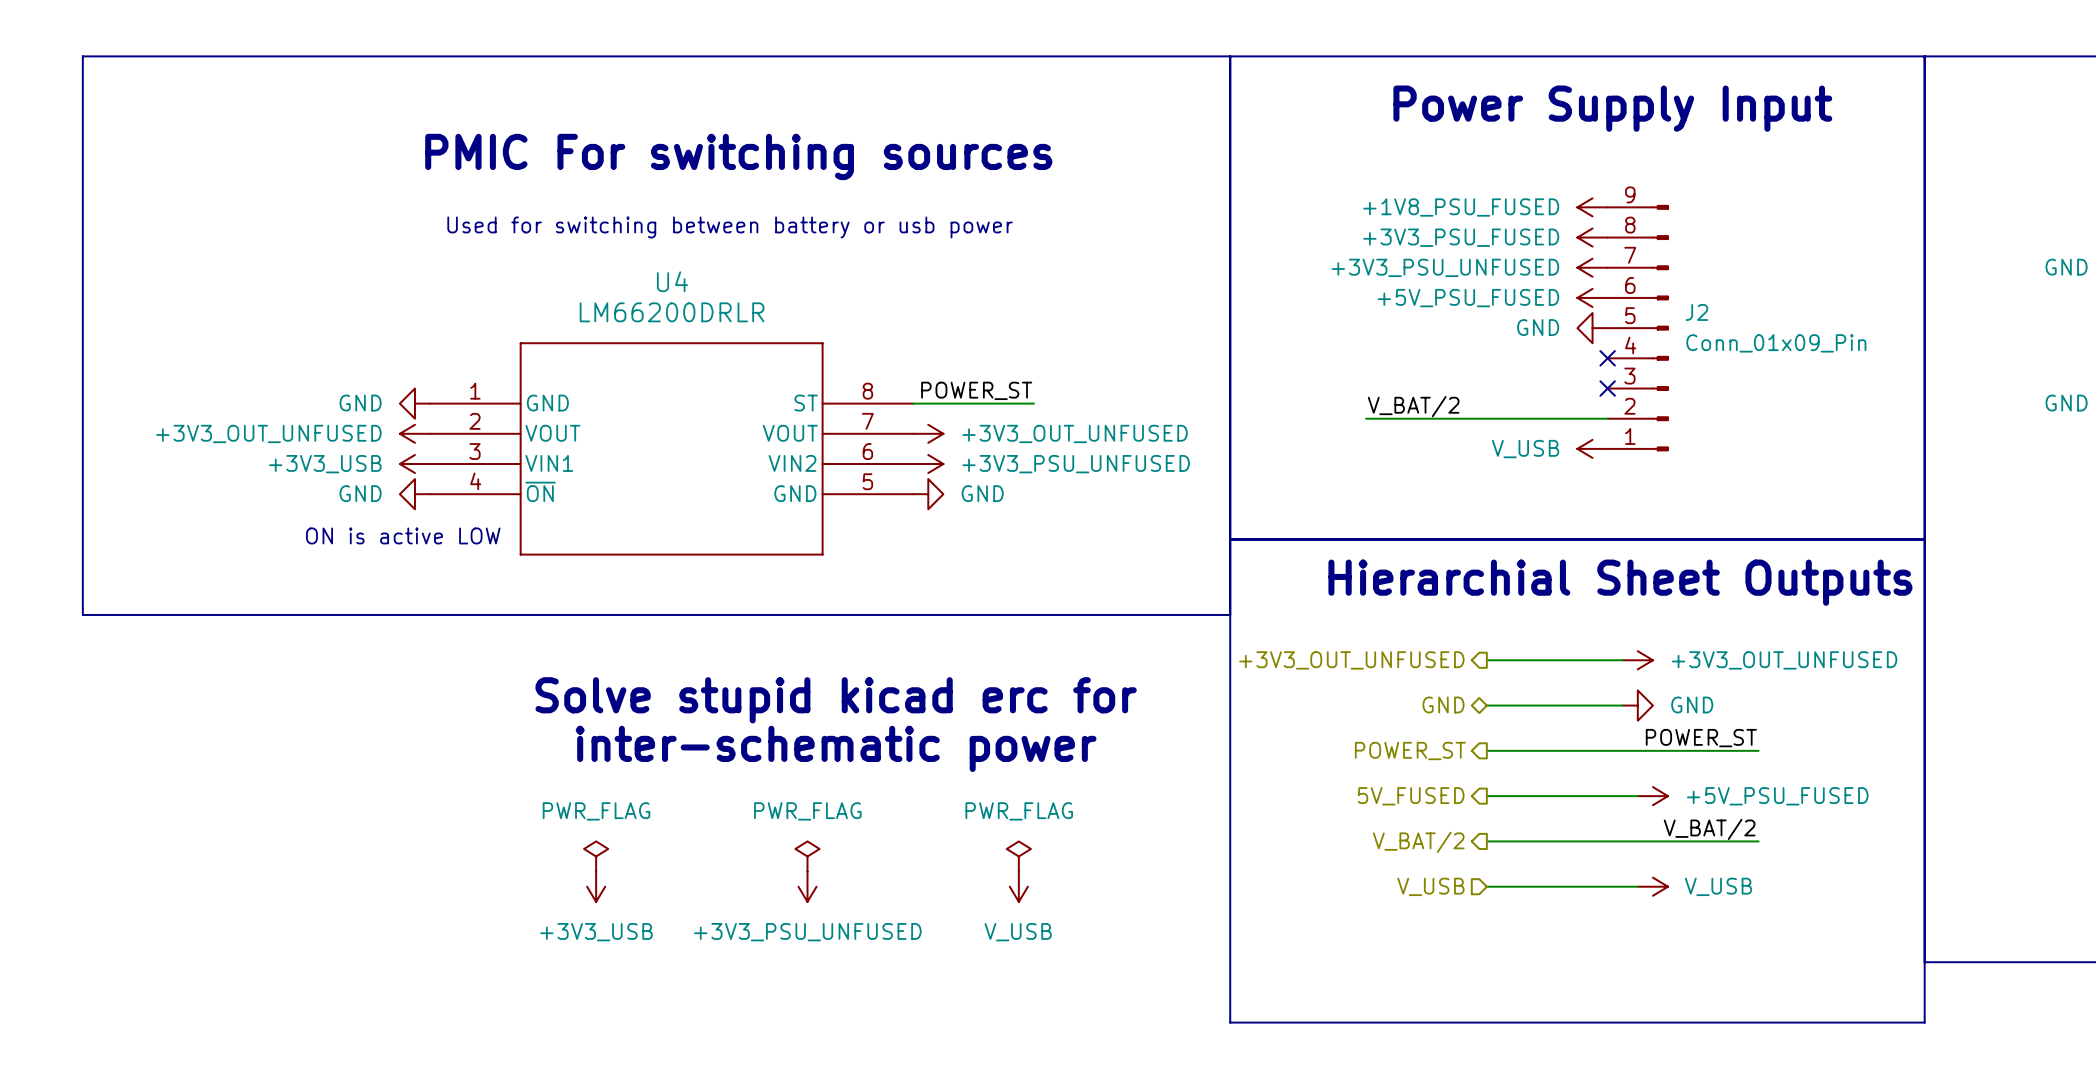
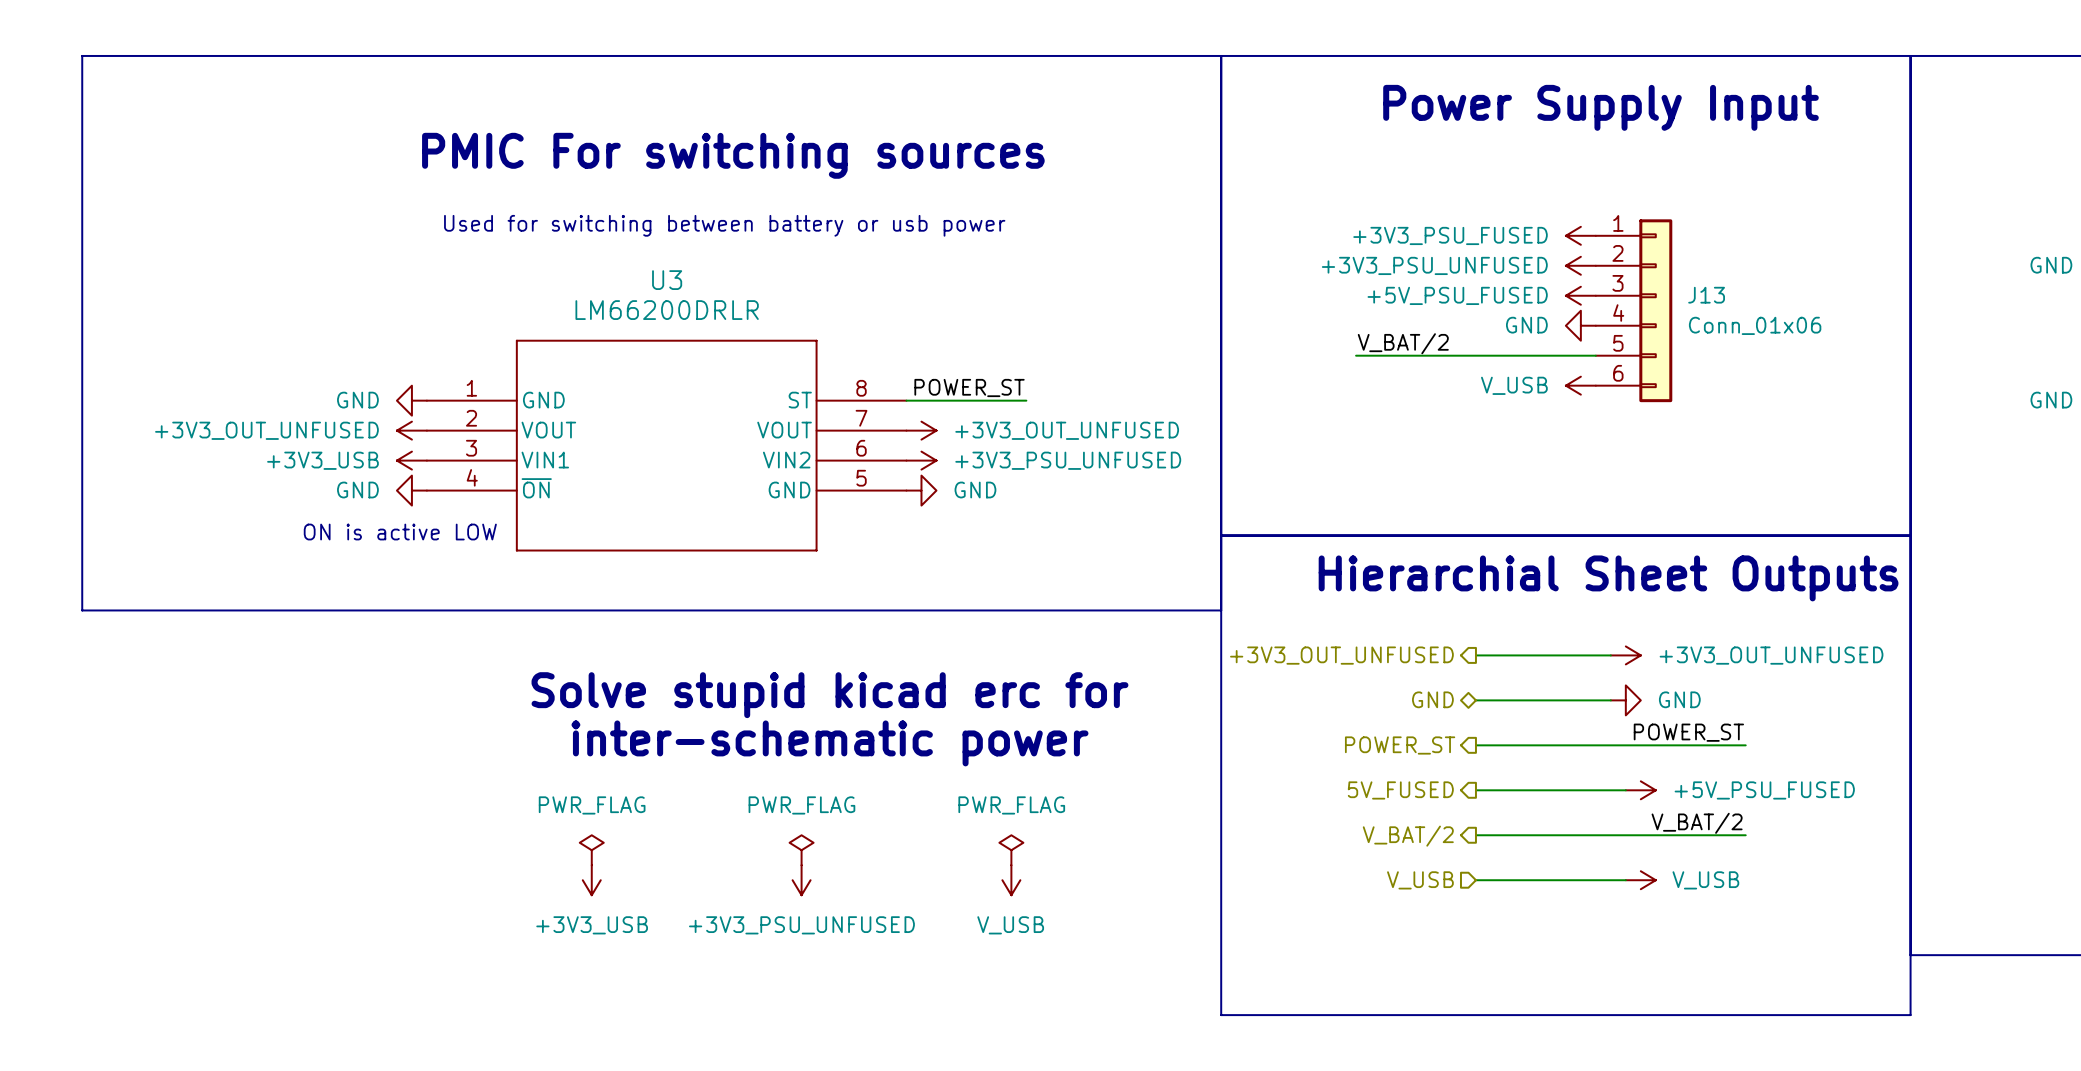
power symbol: +1V8_PSU_FUSED (1592, 207) -> none
U4 name: U4 (672, 281) -> U3 (667, 280)
J13: none -> Conn_01x06 (1634, 310)
J2: Conn_01x09_Pin (1638, 328) -> none
no-connect mark: (1607, 358) -> none
no-connect mark: (1607, 388) -> none
label position: V_BAT/2 (1413, 406) -> V_BAT/2 (1403, 343)
wire: (1366, 418) (1607, 418) -> (1356, 355) (1595, 355)
power symbol position: V_USB (1592, 448) -> V_USB (1580, 385)

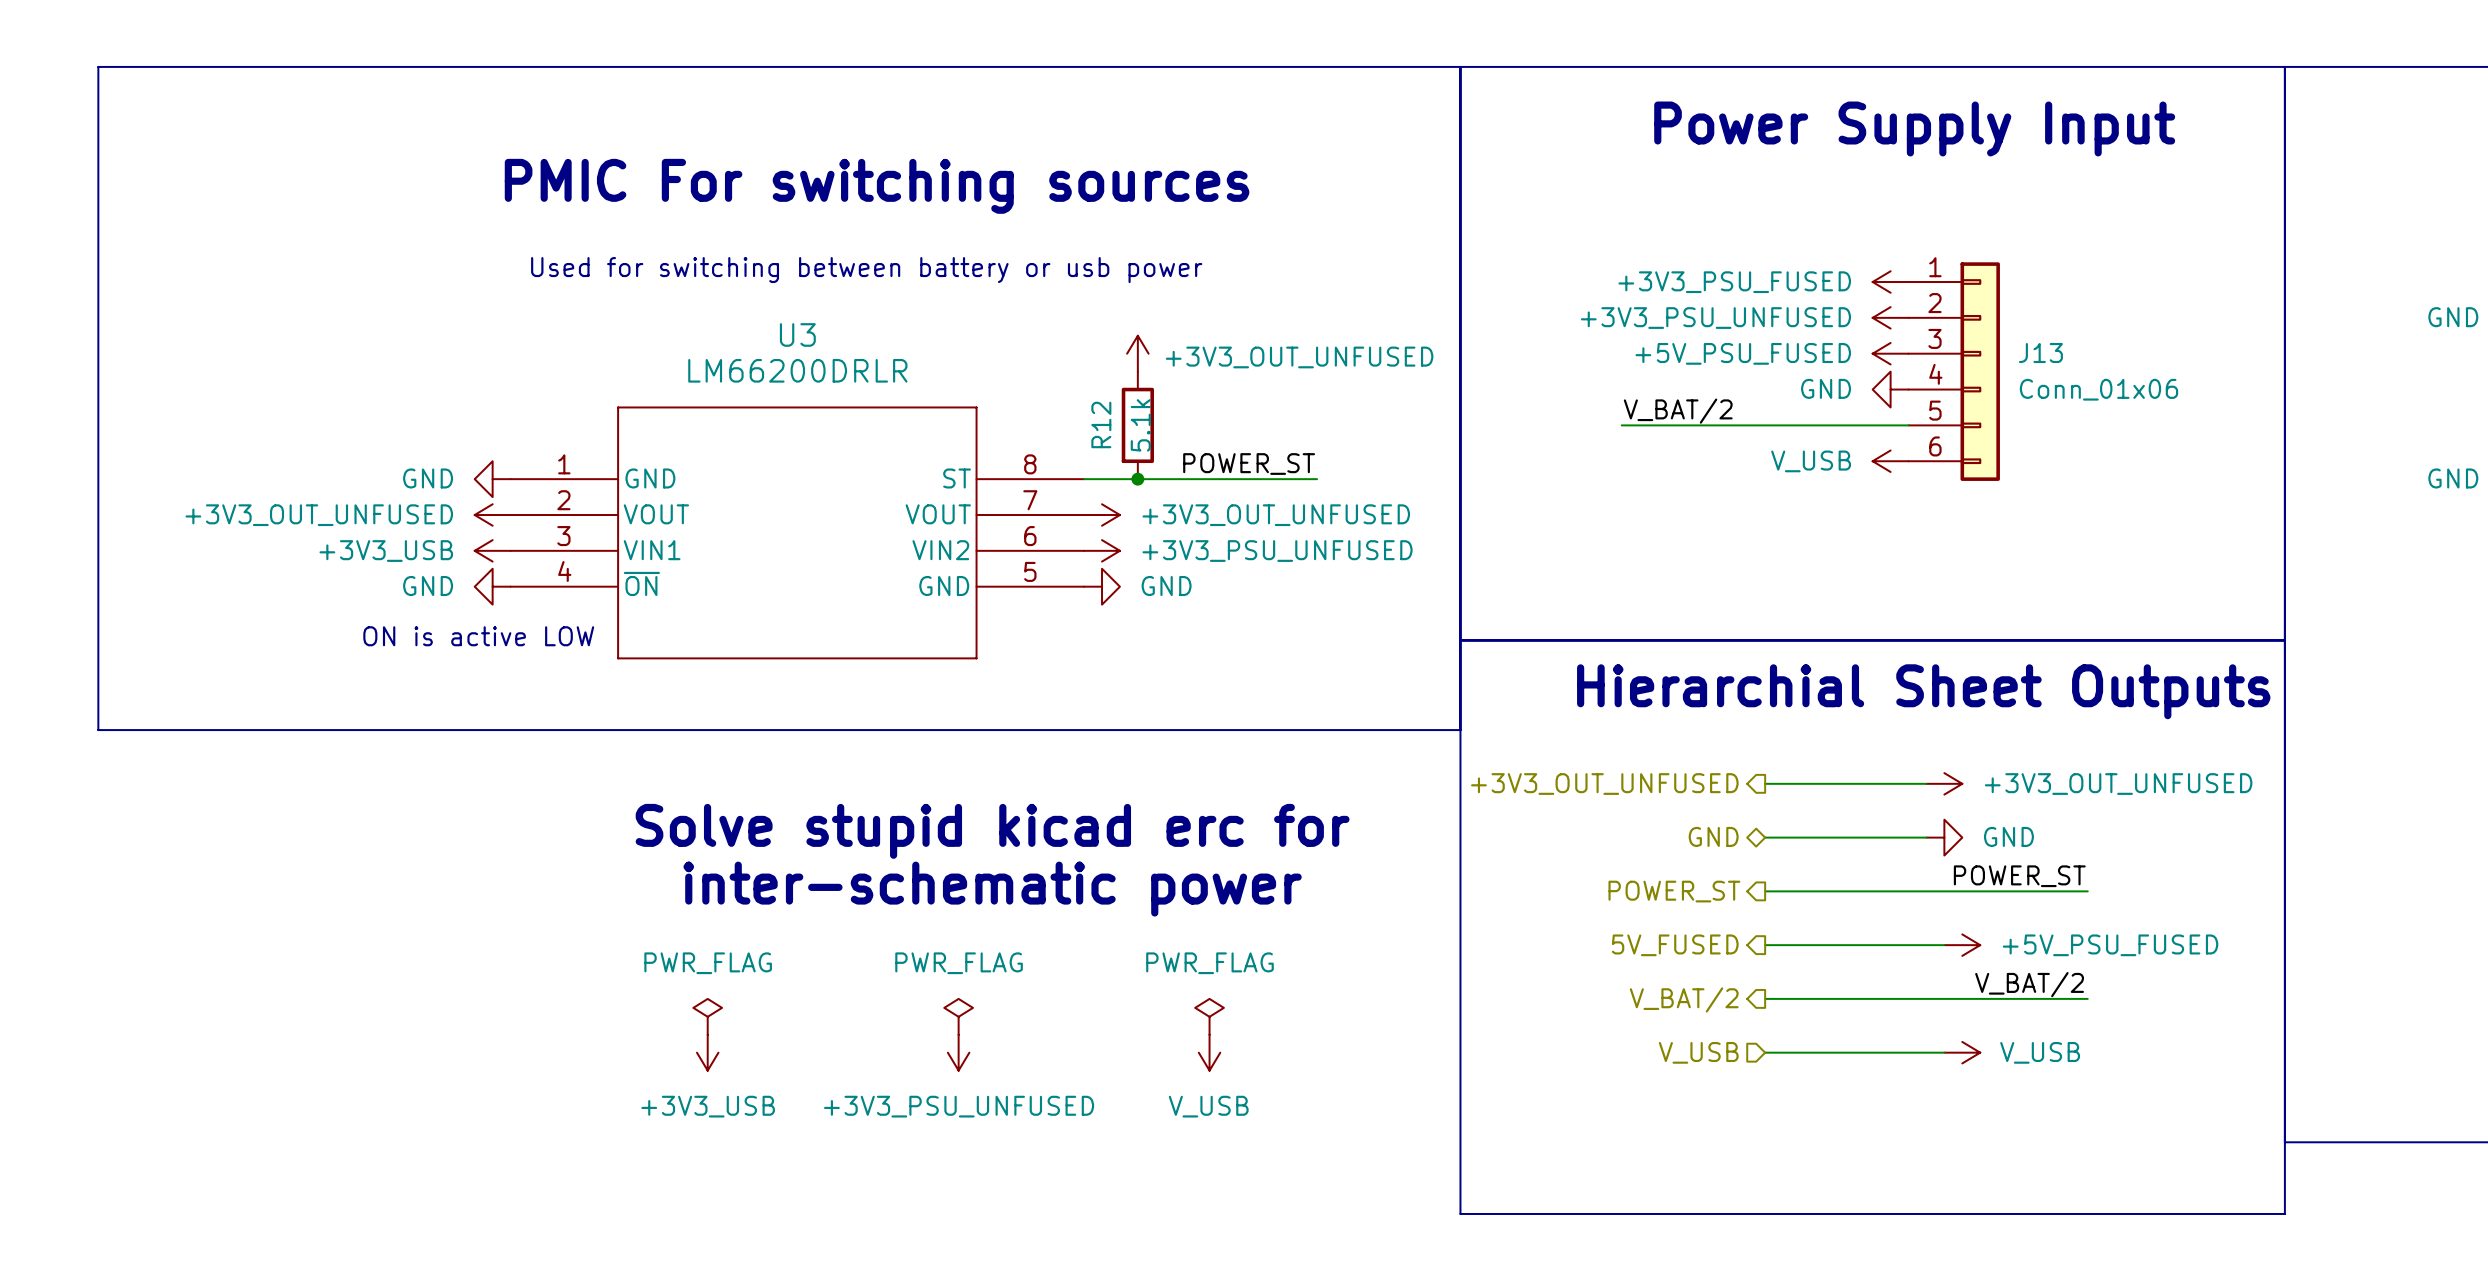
power symbol: none -> +3V3_OUT_UNFUSED (1137, 353)
R12: none -> 5.1k (1137, 425)
label position: POWER_ST (969, 387) -> POWER_ST (1249, 464)
junction: none -> (1137, 479)
wire: none -> (1227, 479) (1317, 479)

